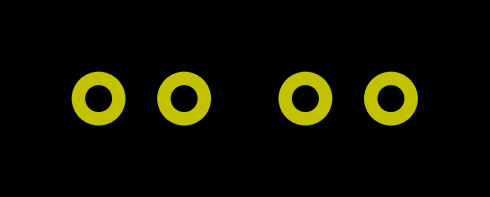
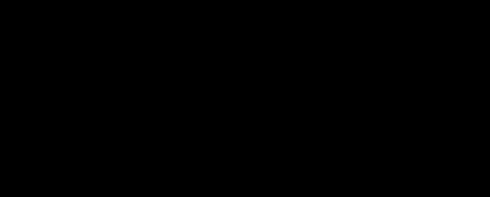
part: (141, 98) -> none
part: (348, 98) -> none

